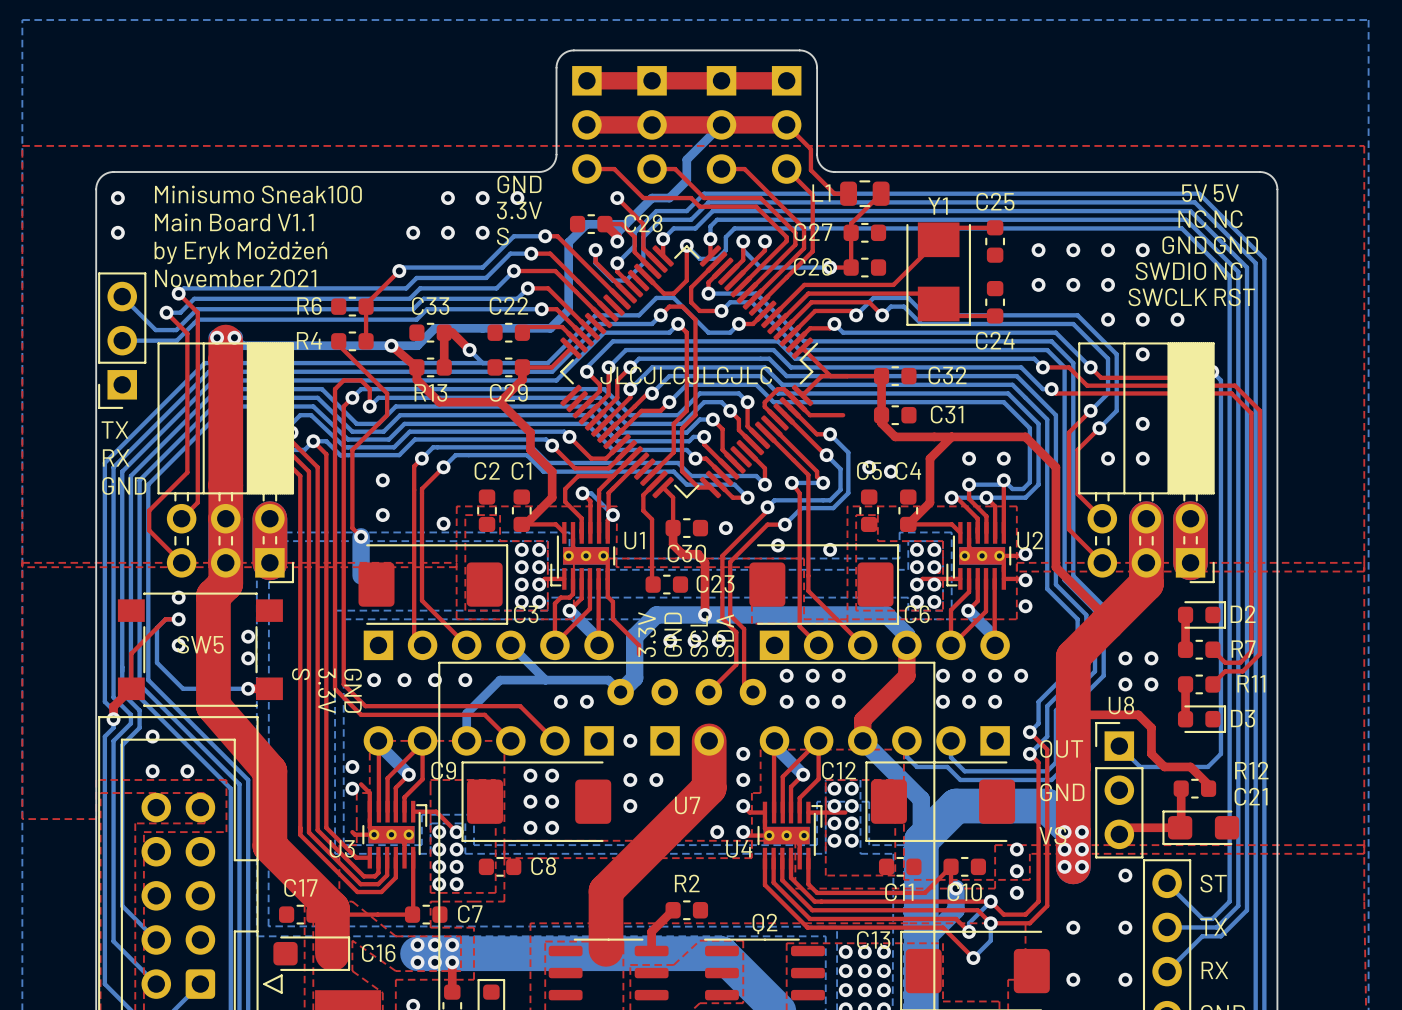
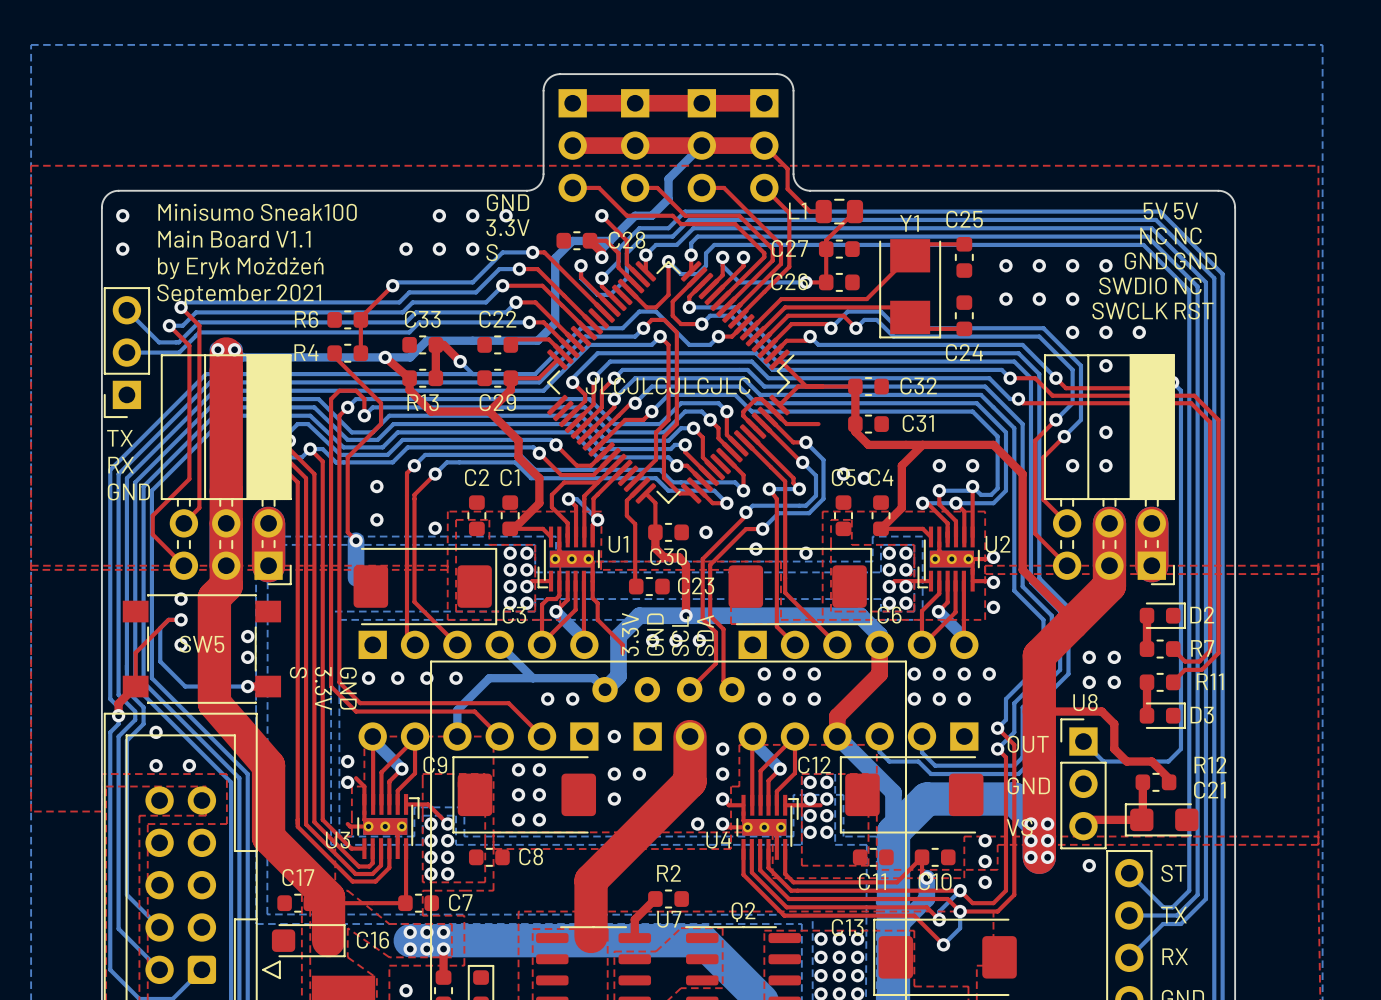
text: November 2021 (235, 278) -> September 2021 (239, 295)
U7 name position: U7 (687, 805) -> U7 (669, 919)
via: (1073, 927) -> none
via: (1125, 927) -> none
via: (1073, 979) -> none
via: (1125, 979) -> none

